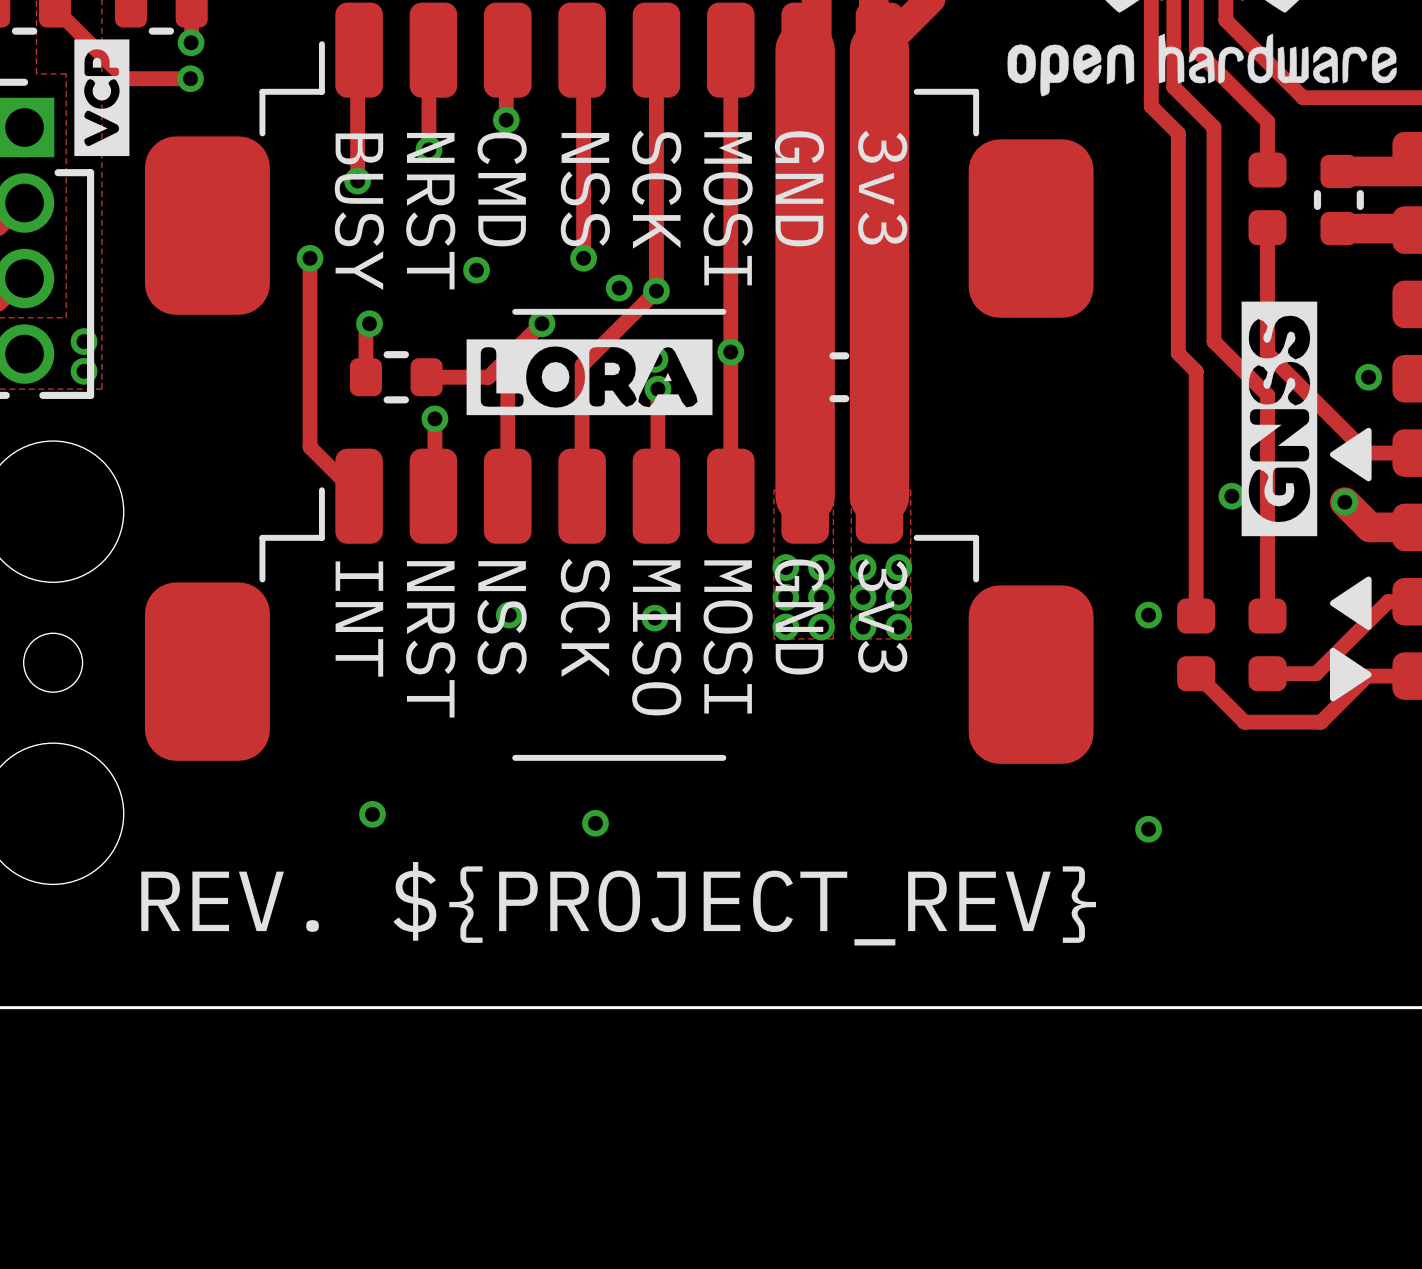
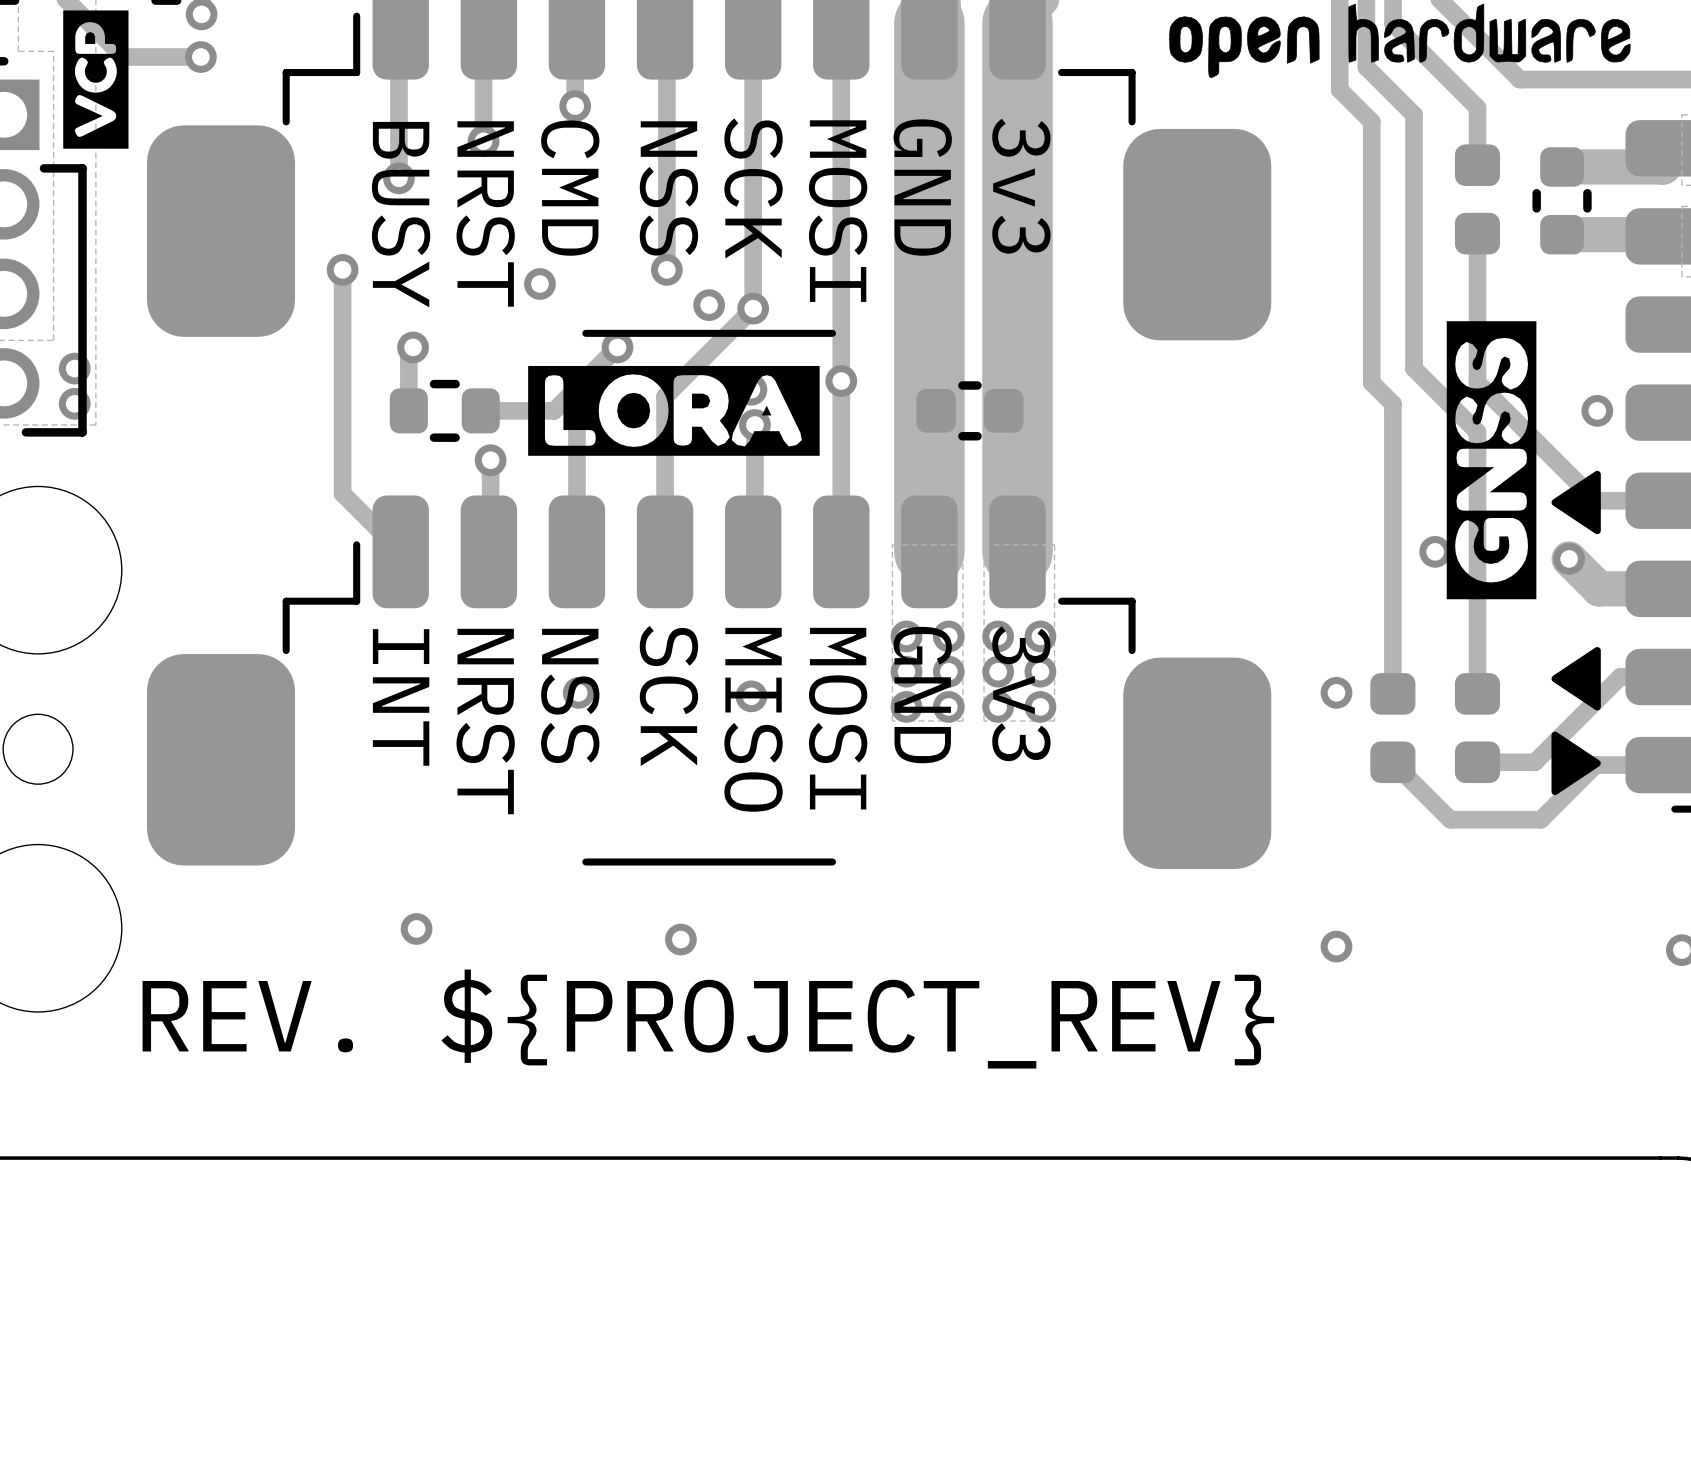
text position: REV. ${PROJECT_REV} (618, 903) -> REV. ${PROJECT_REV} (708, 1019)

